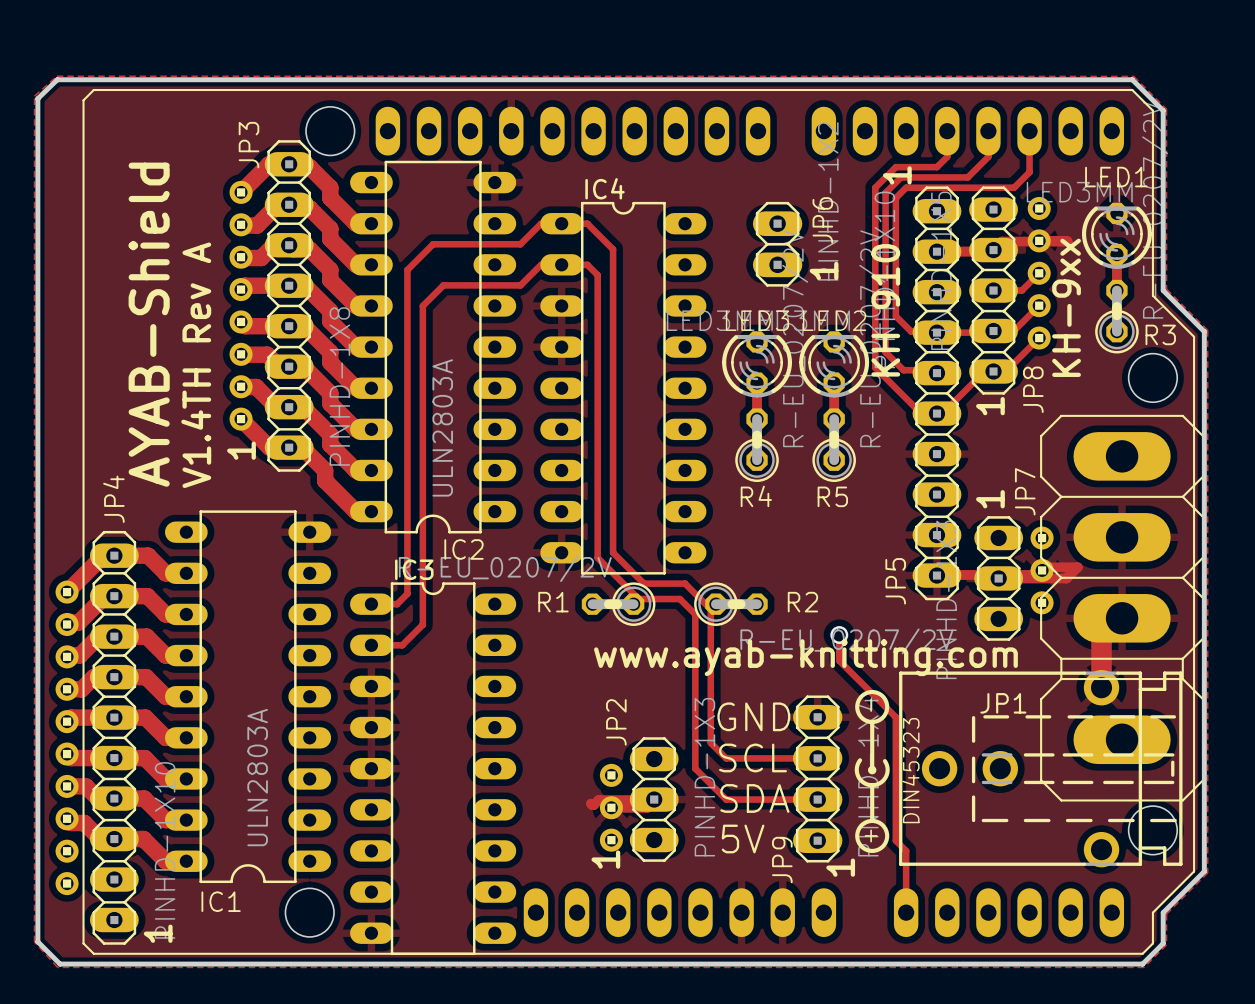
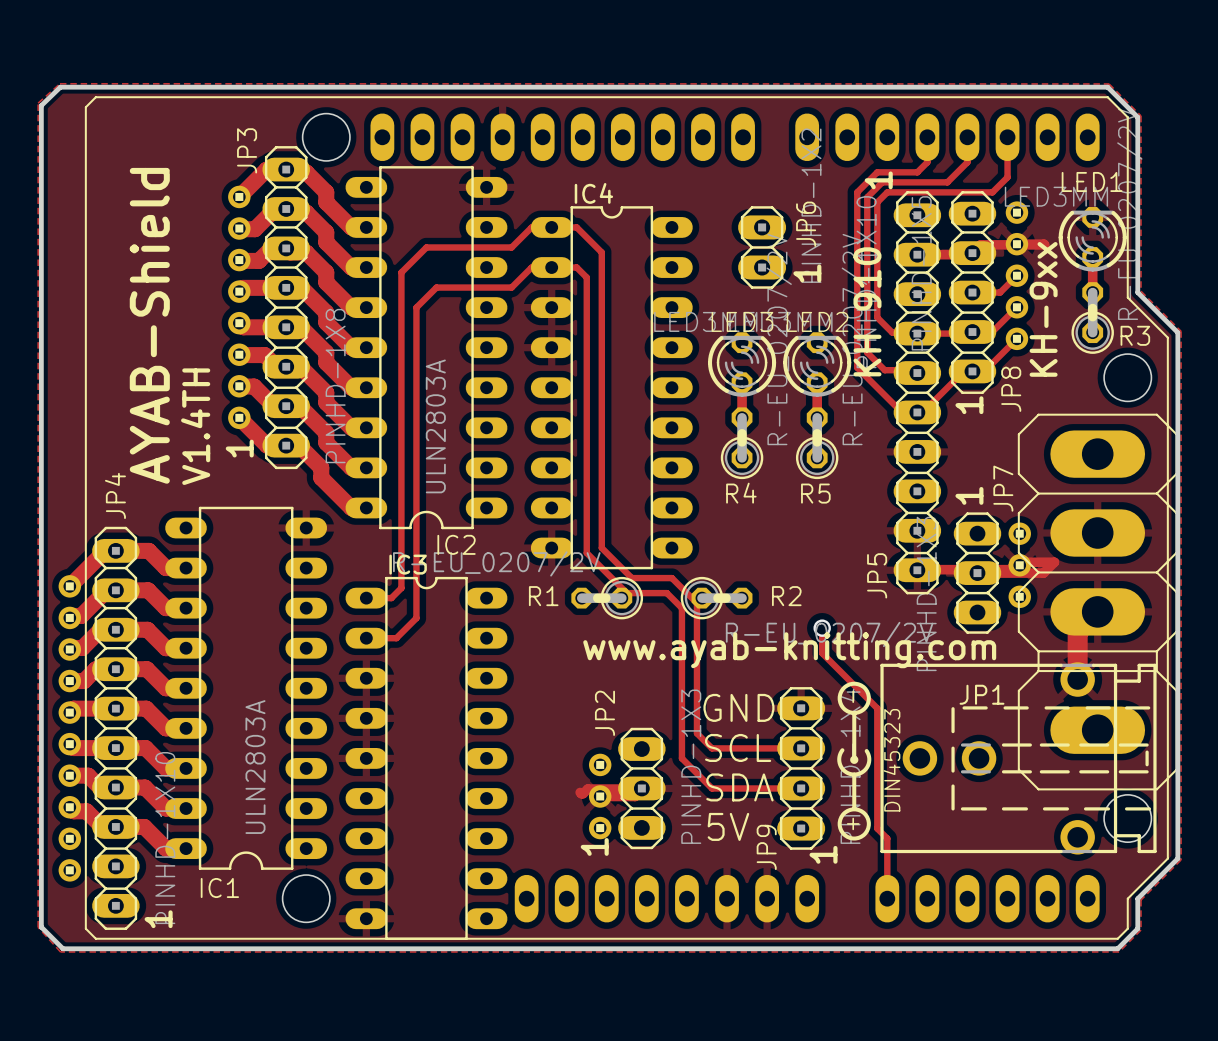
text: V1.4TH Rev A (196, 365) -> V1.4TH (195, 426)

